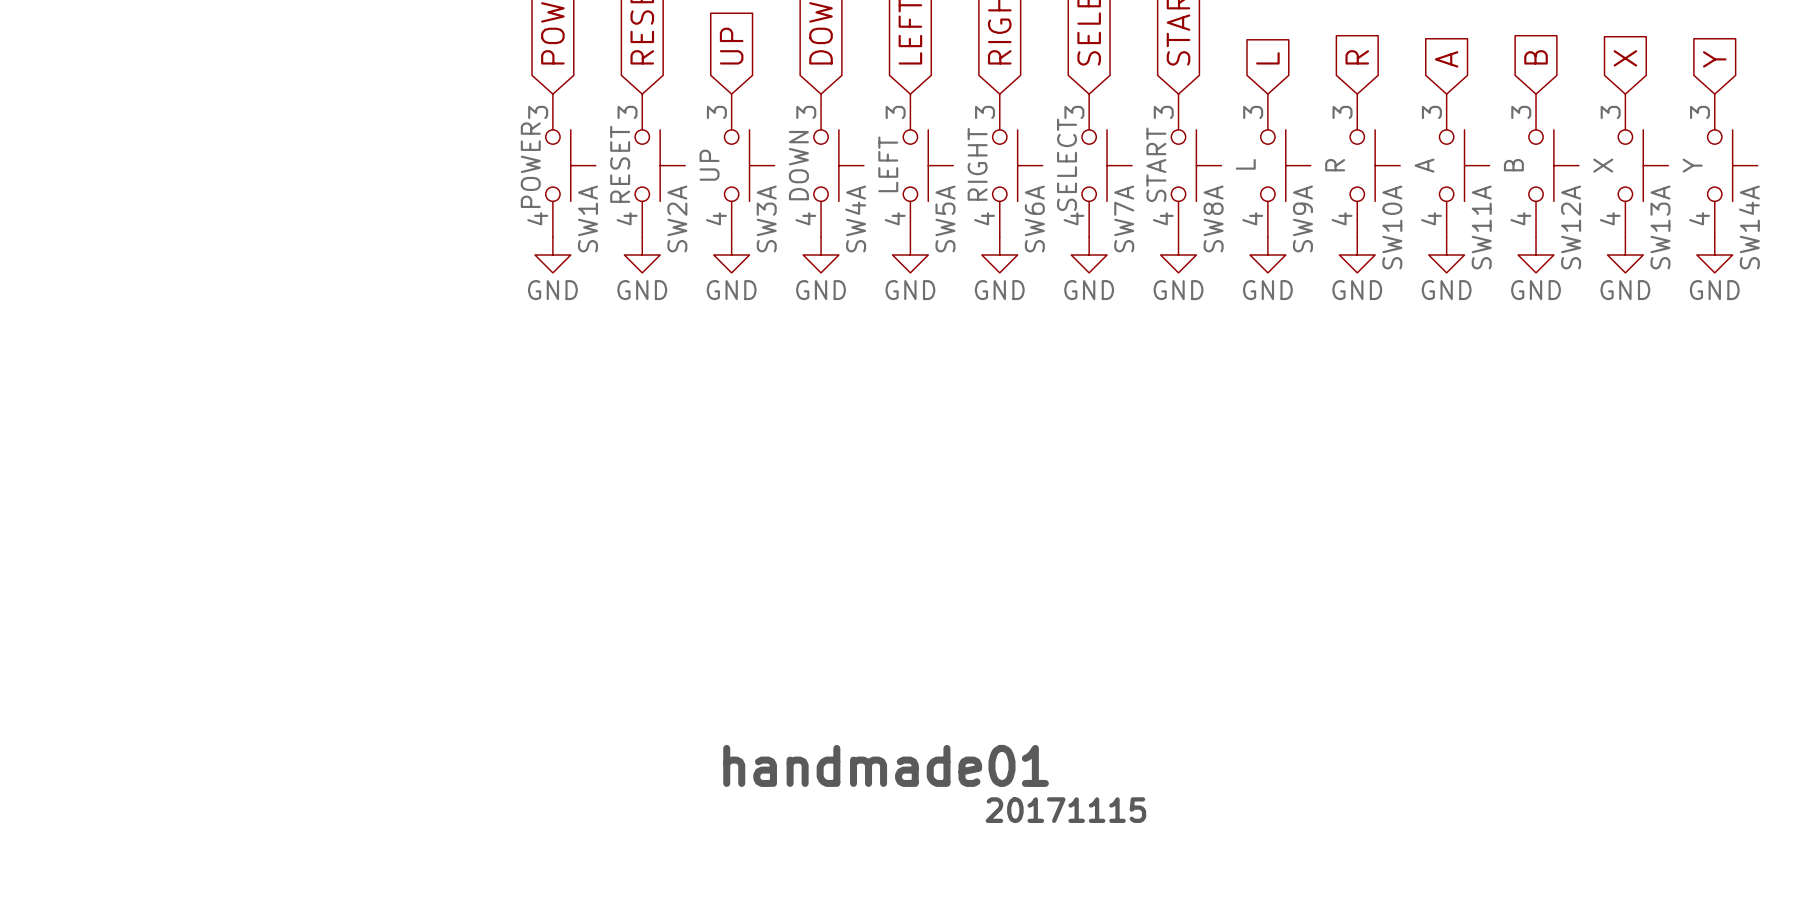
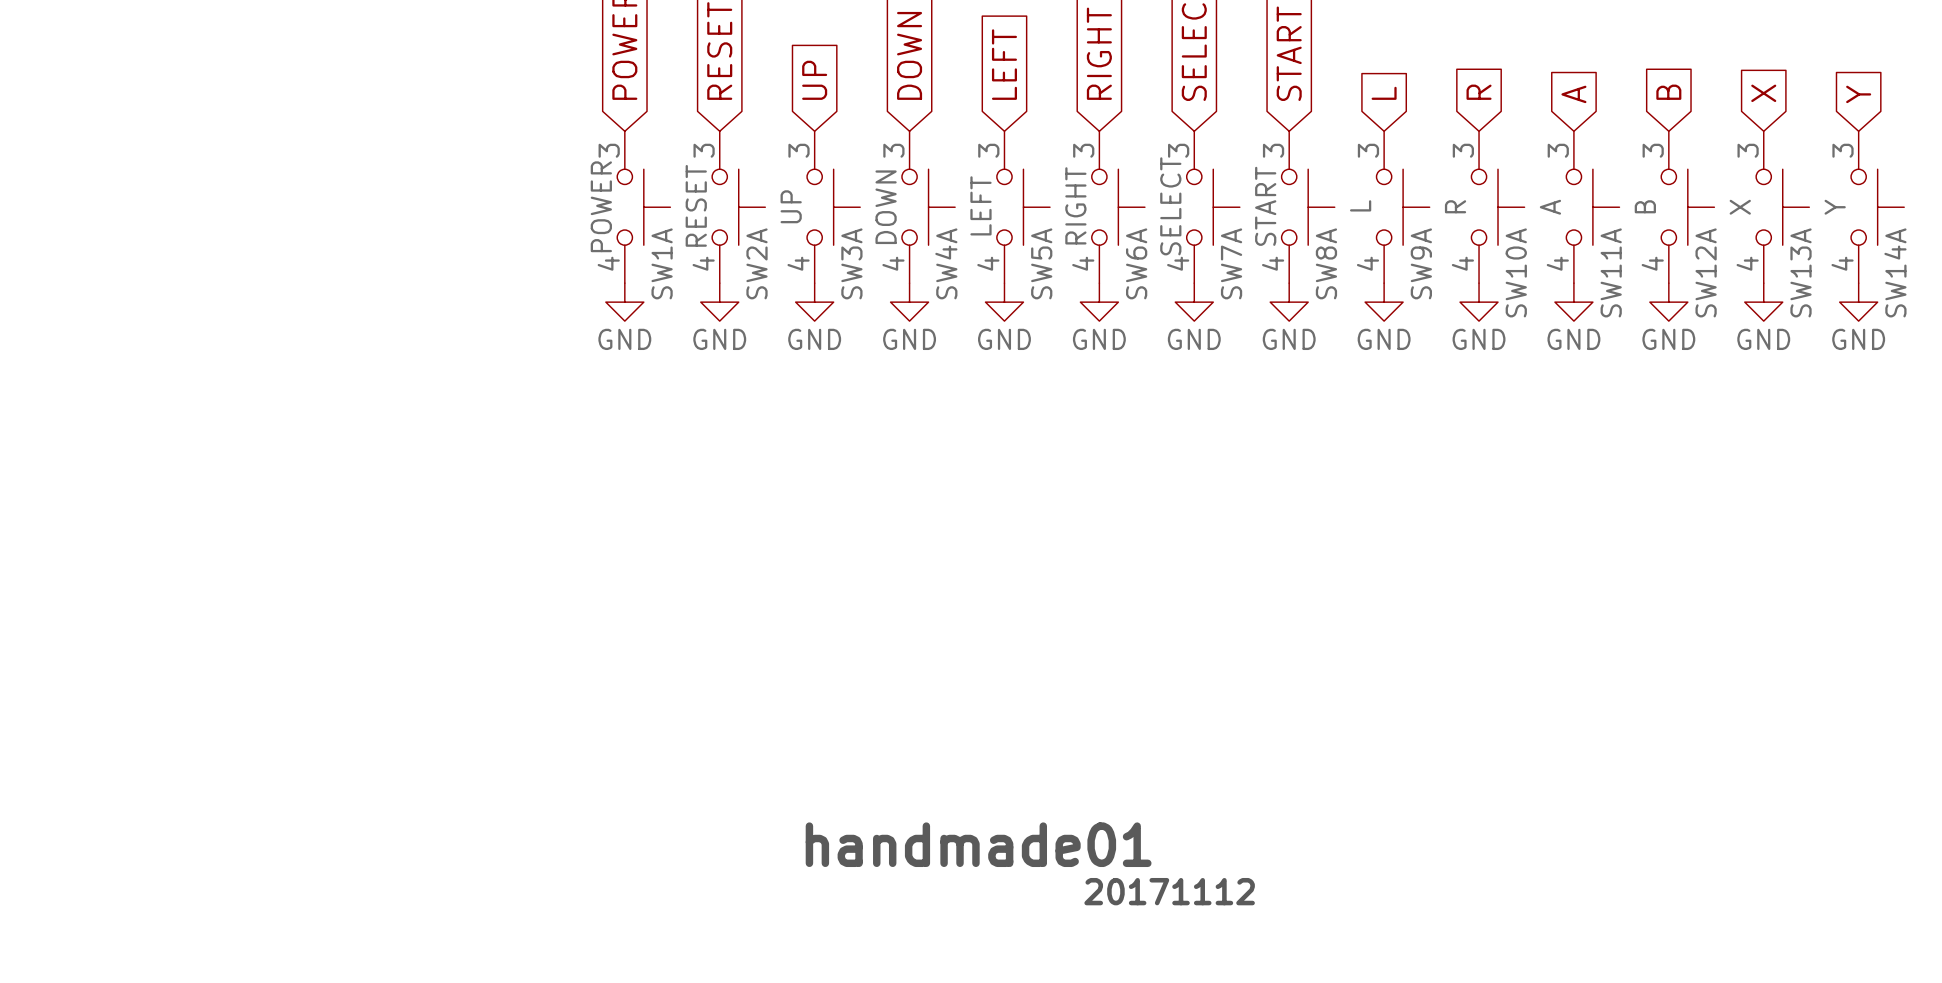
text: 20171115 (1065, 810) -> 20171112 (1169, 891)

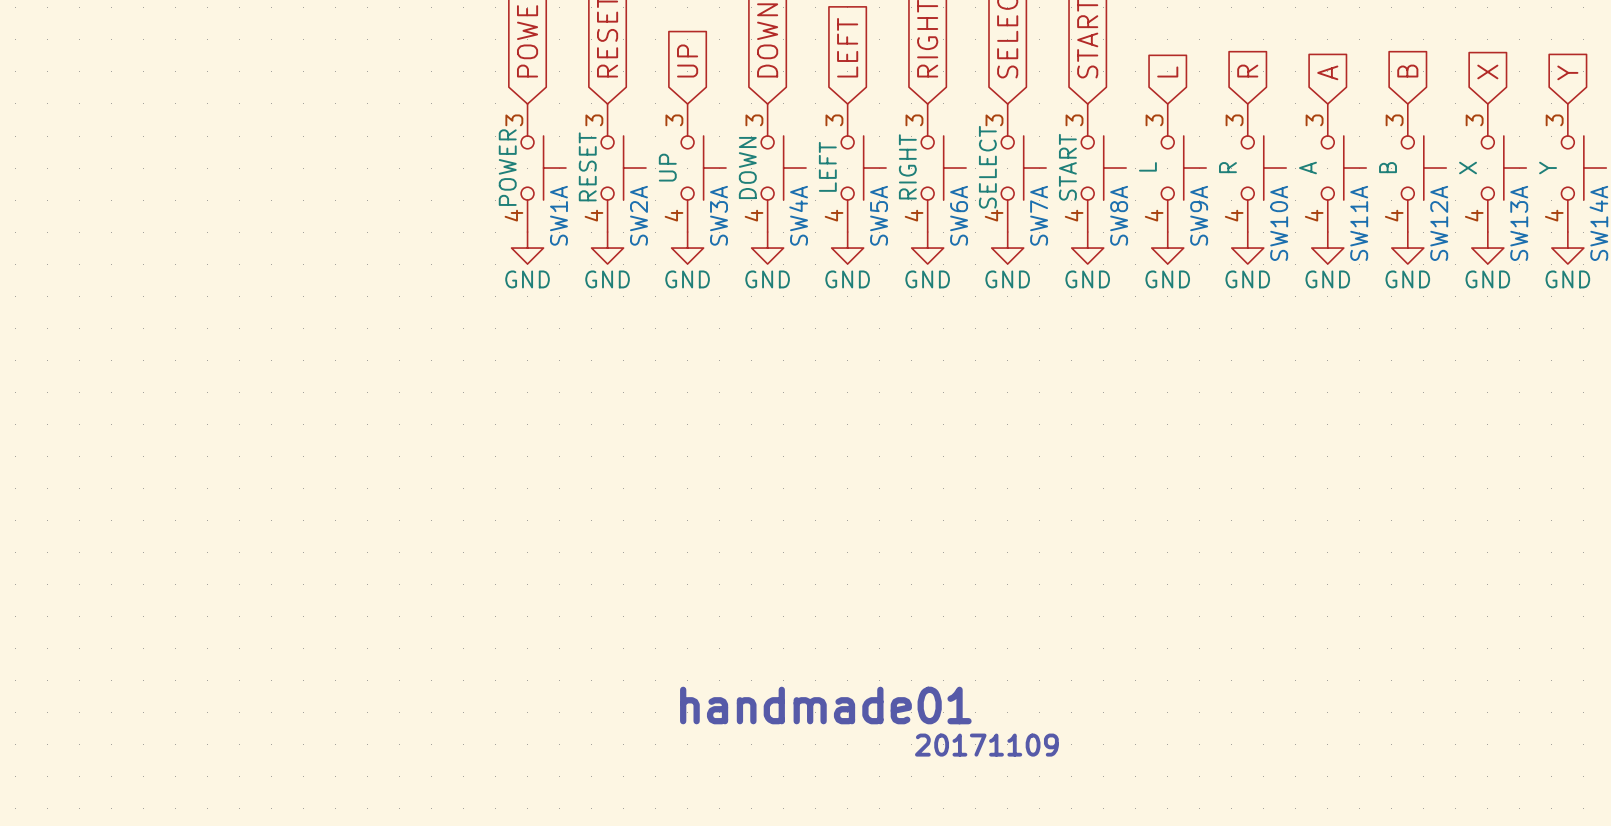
text: 20171112 (1169, 891) -> 20171109 (986, 745)

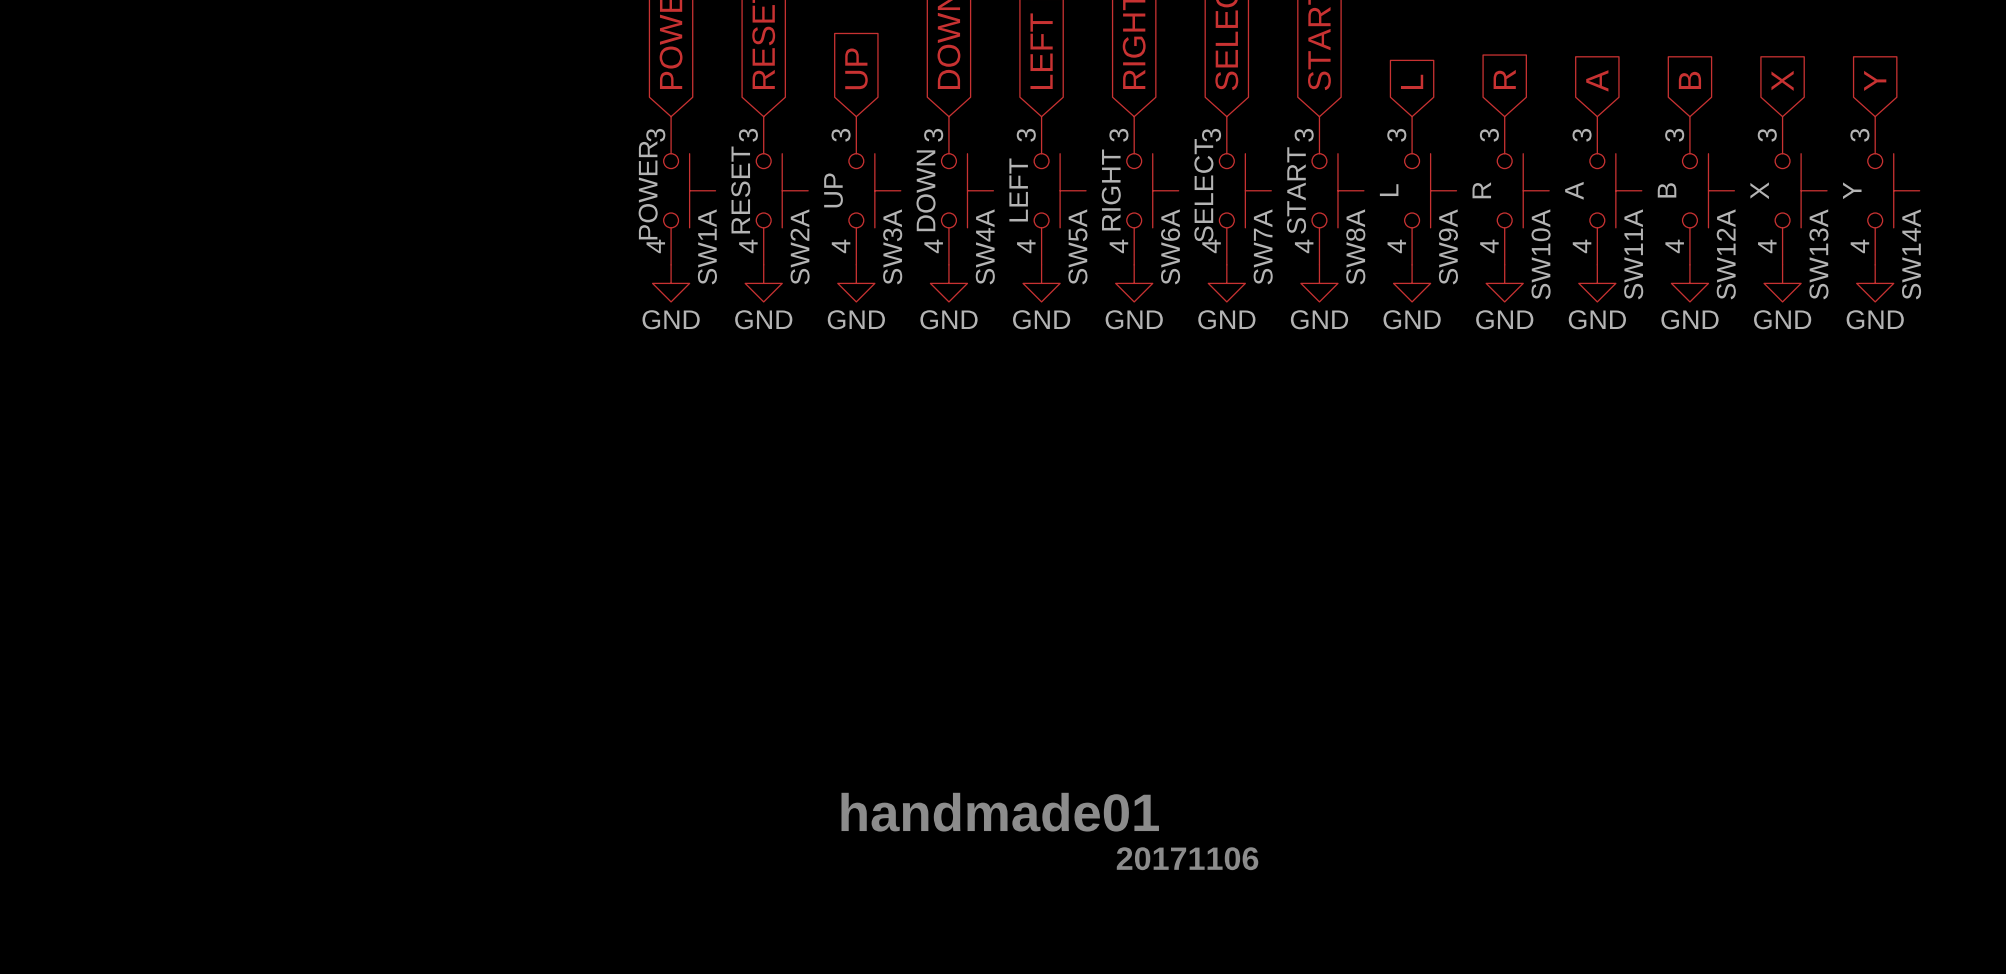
text: 20171109 (986, 745) -> 20171106 (1187, 858)

